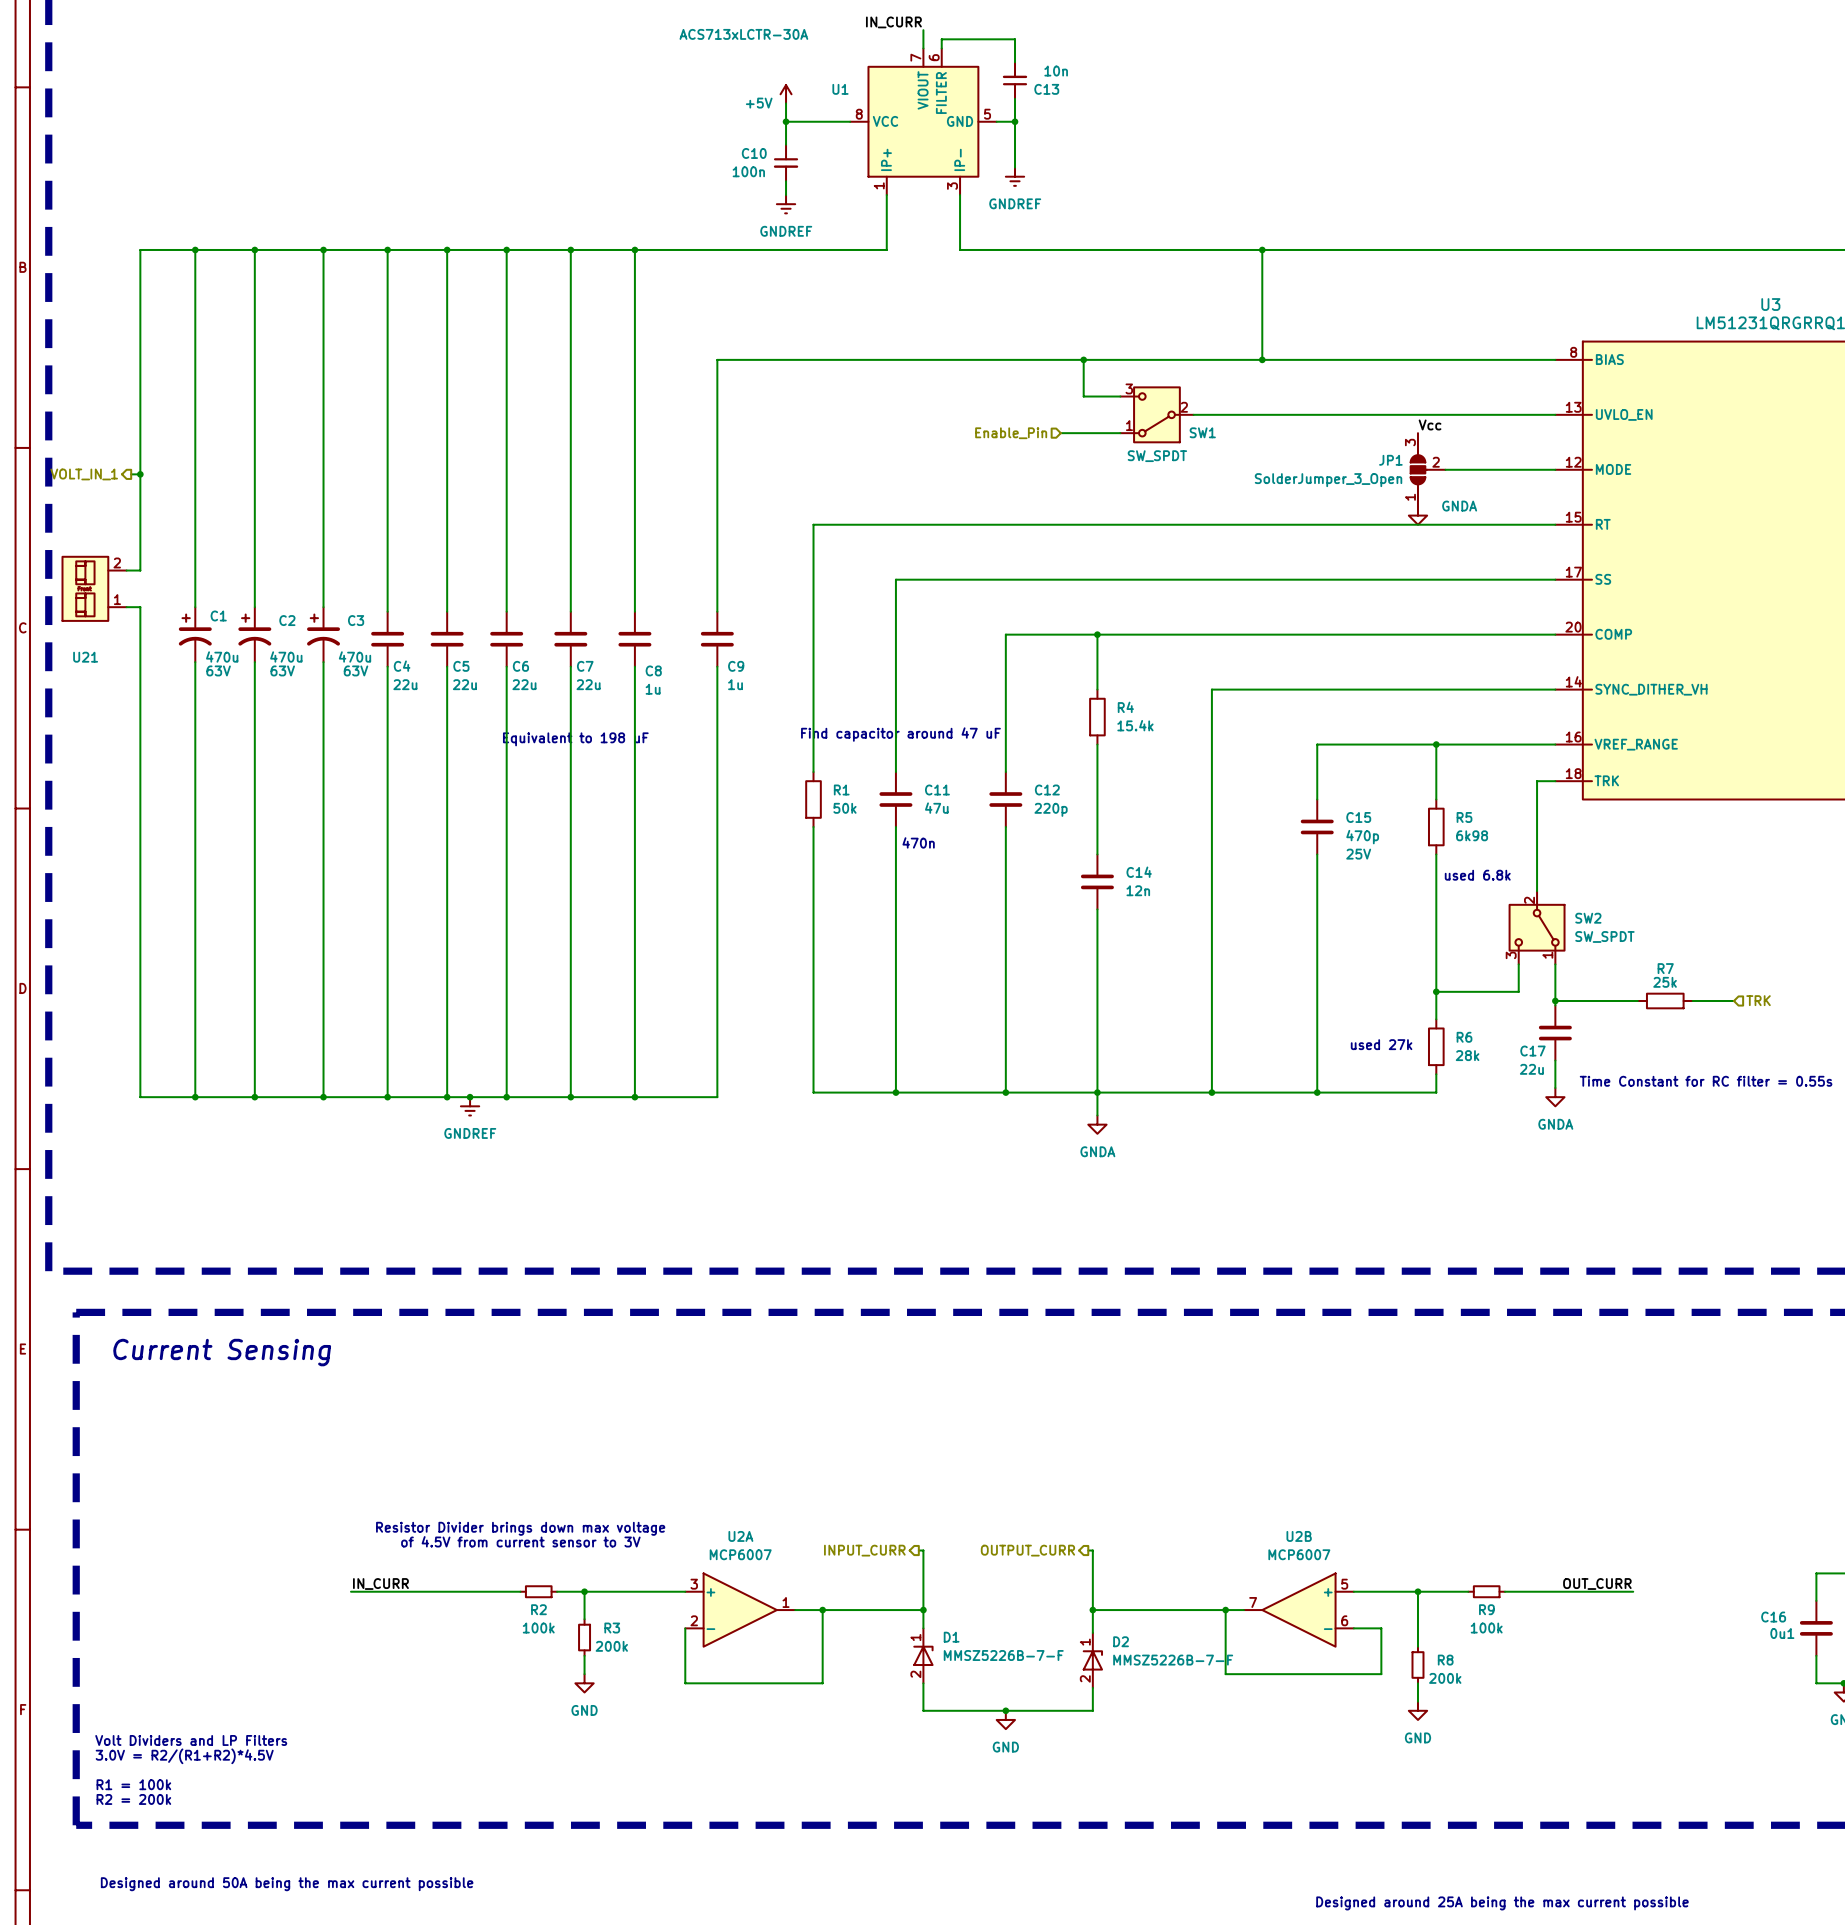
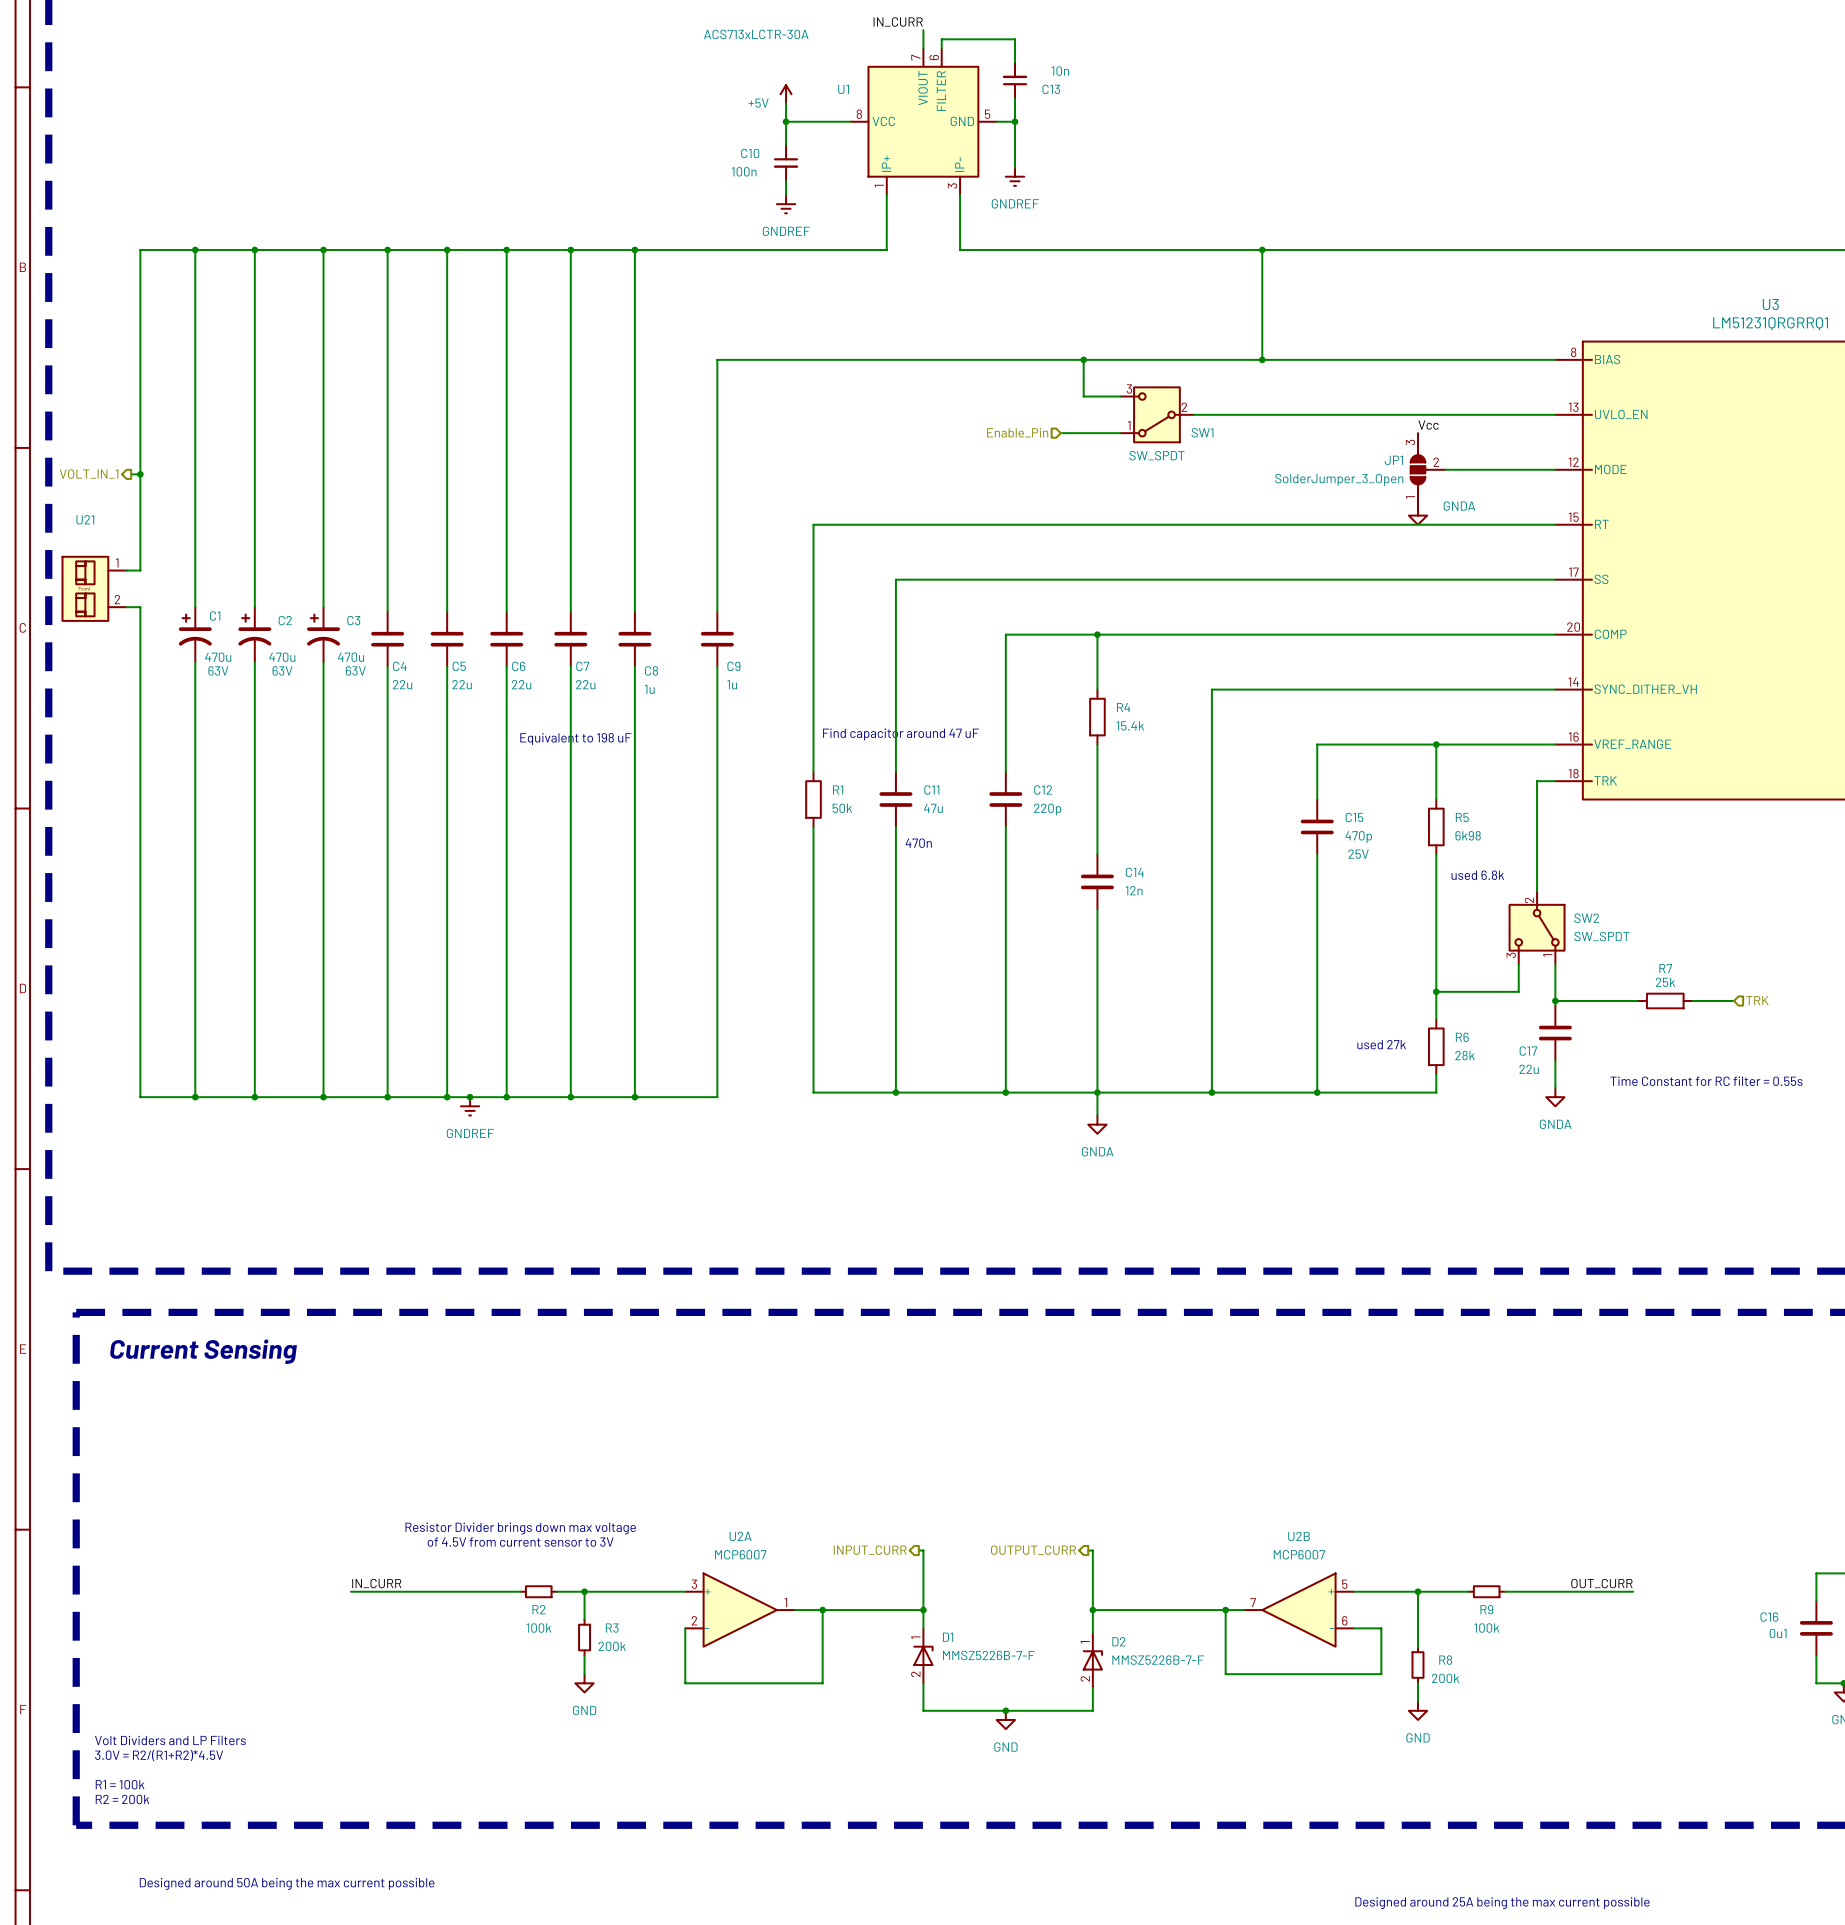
U21 flip: as is (85, 588) -> up-down (85, 588)

